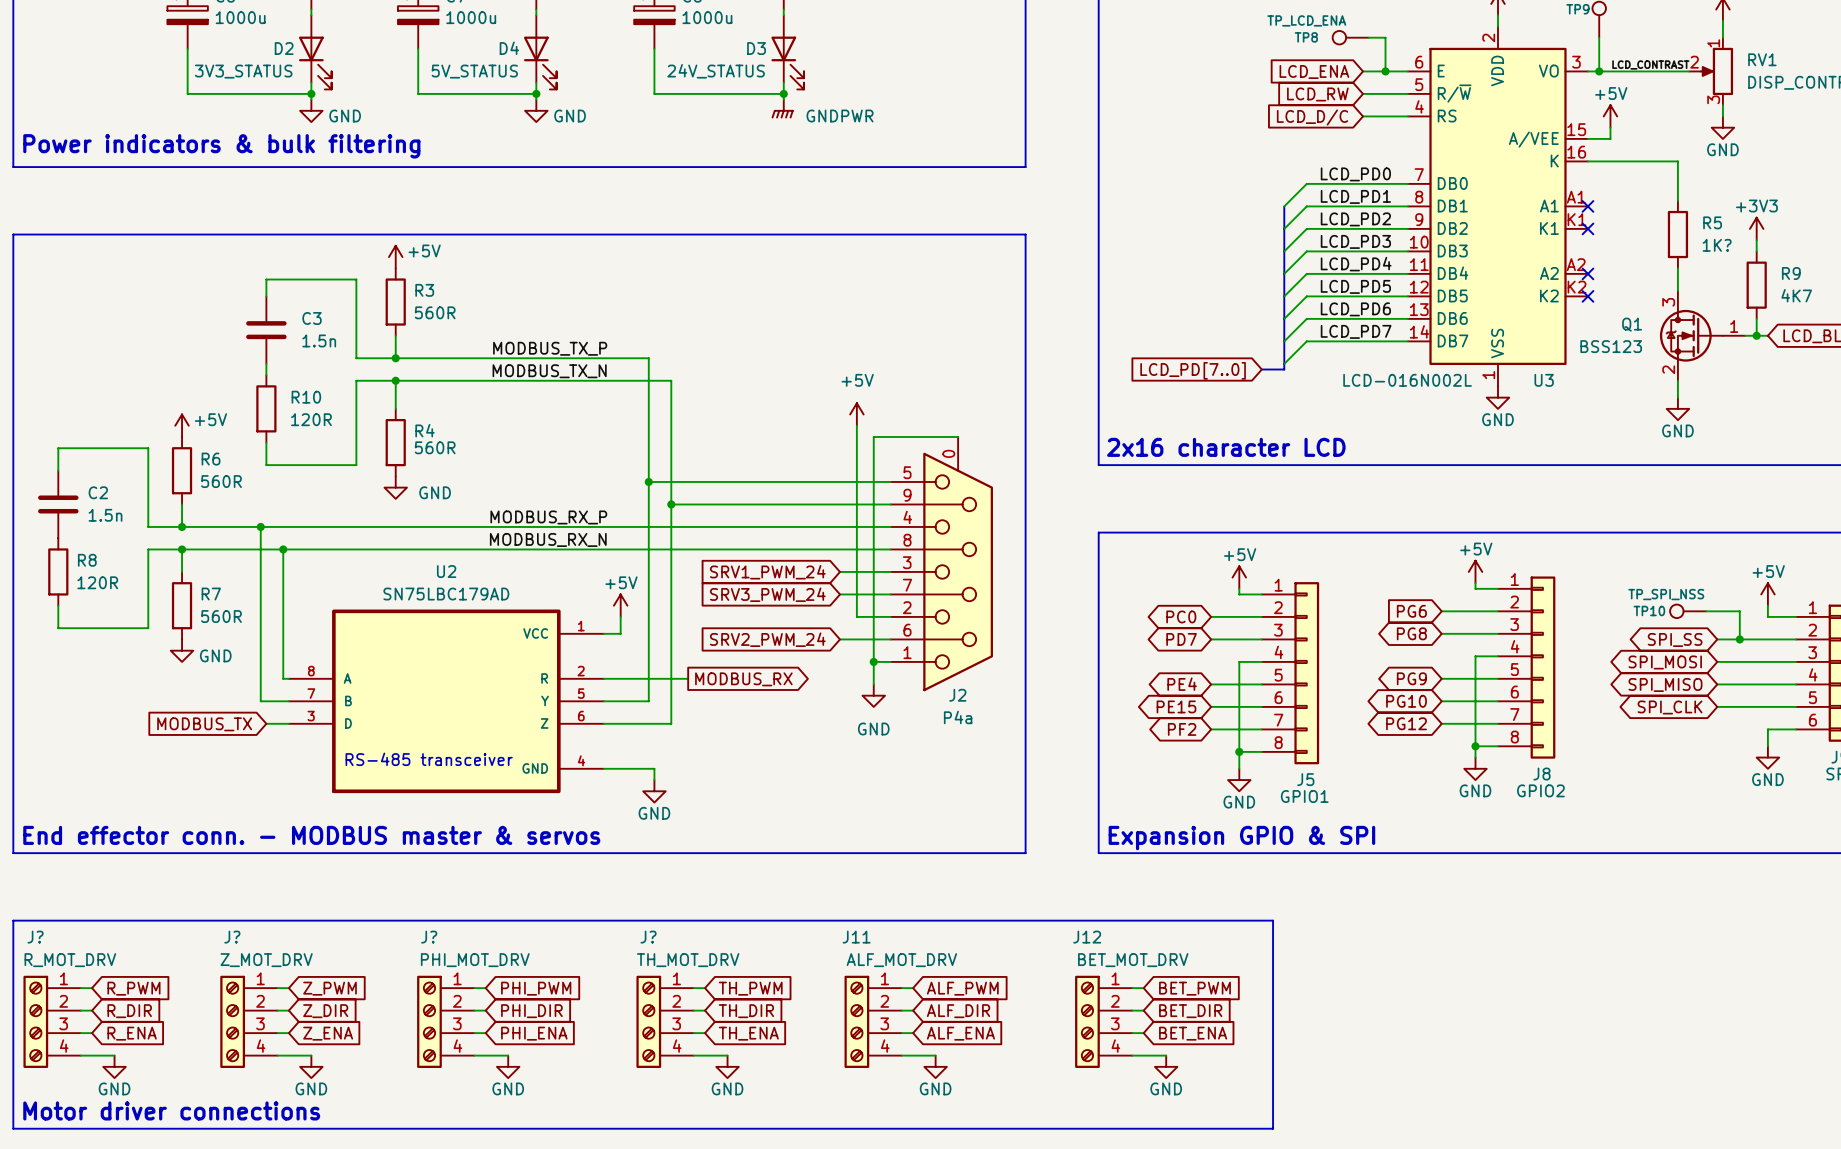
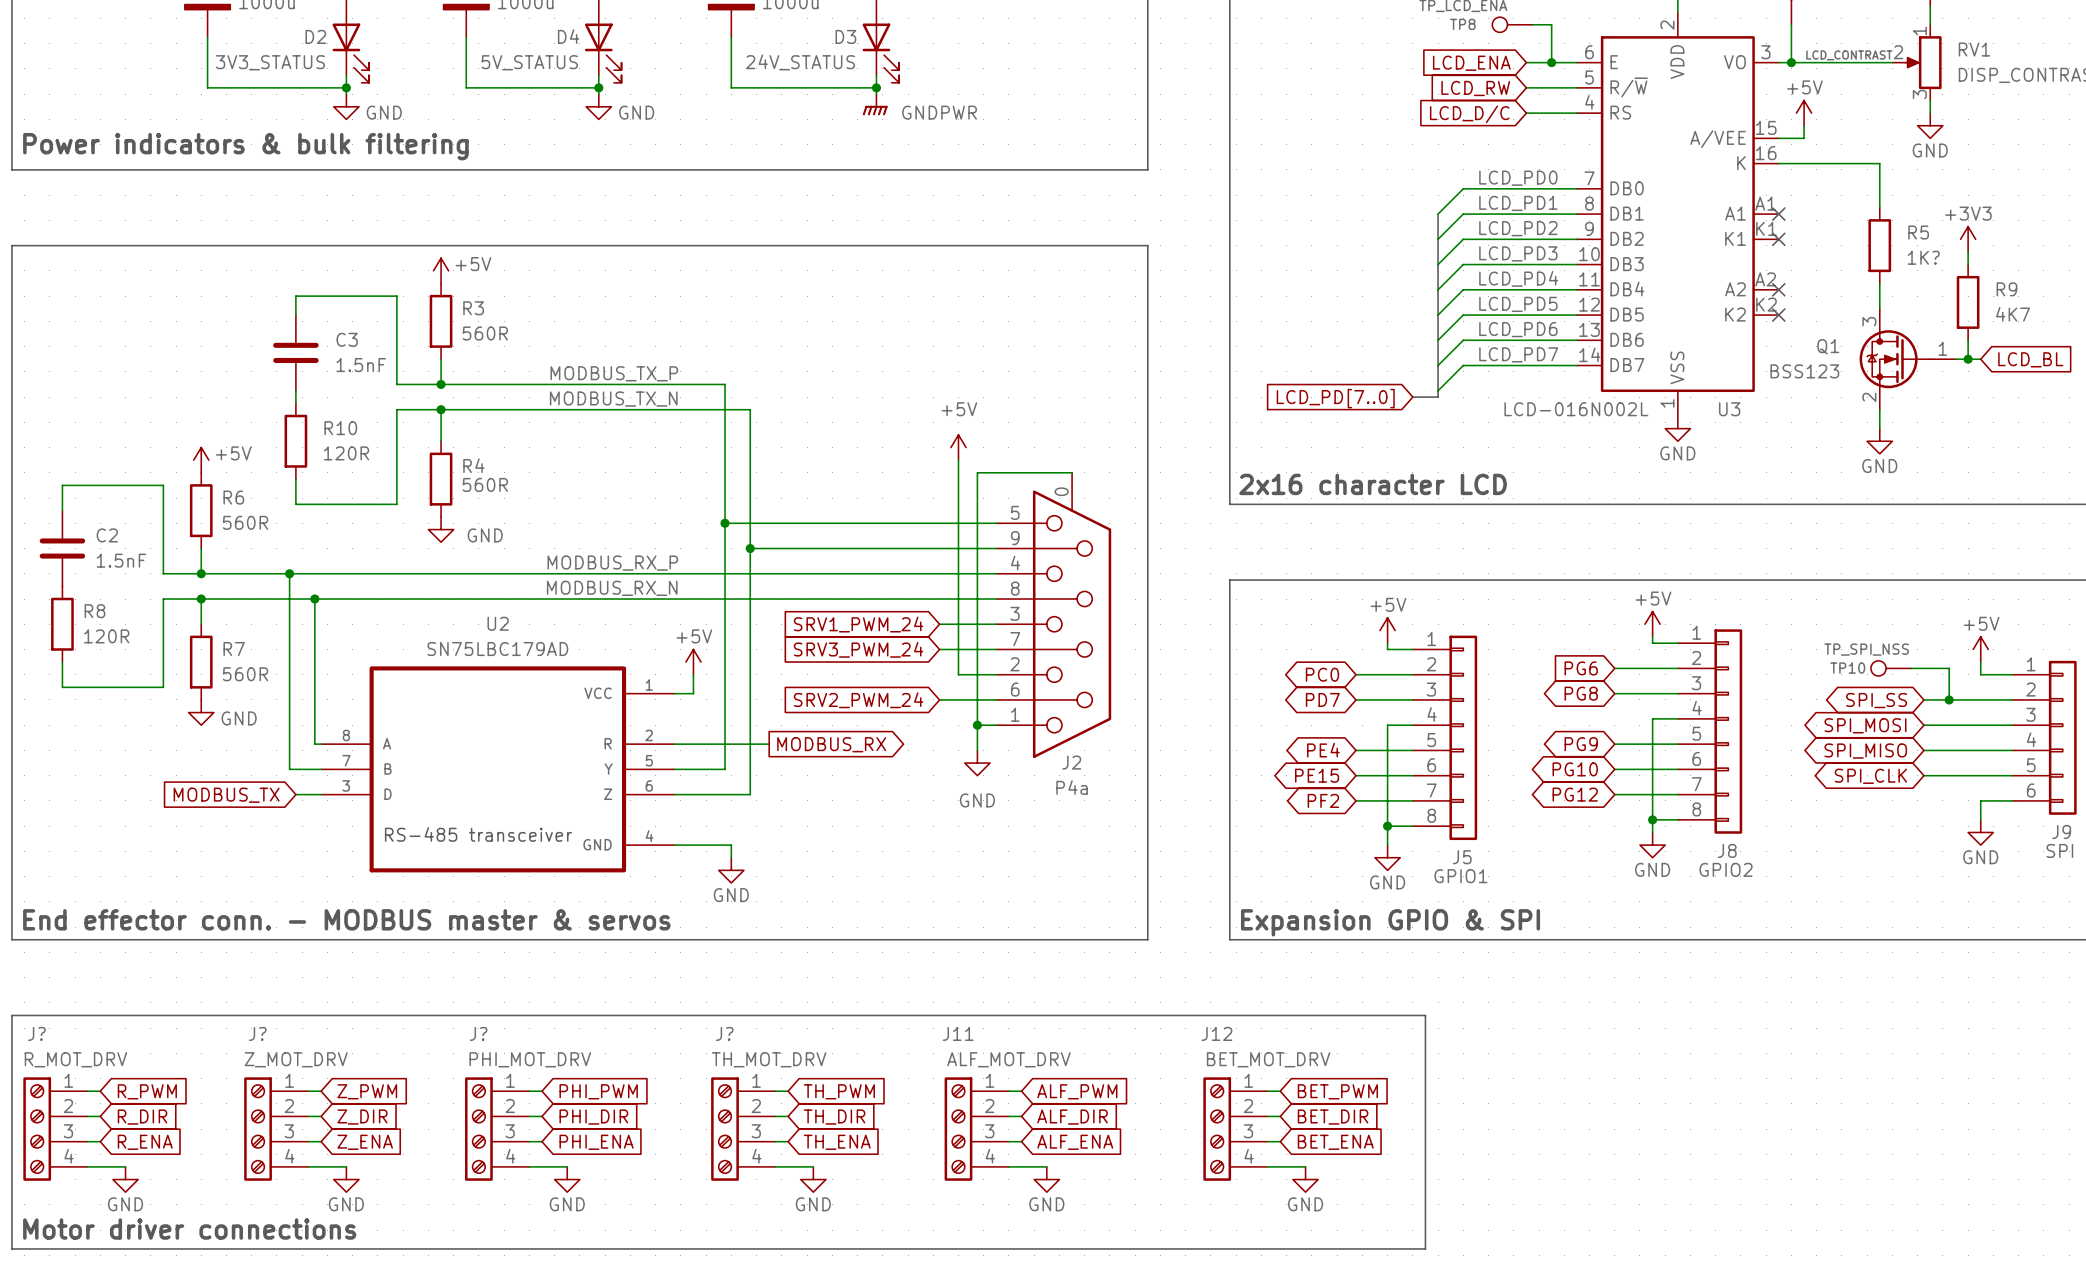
C3 value: 1.5n (319, 340) -> 1.5nF (361, 365)
C2 value: 1.5n (105, 515) -> 1.5nF (121, 560)

